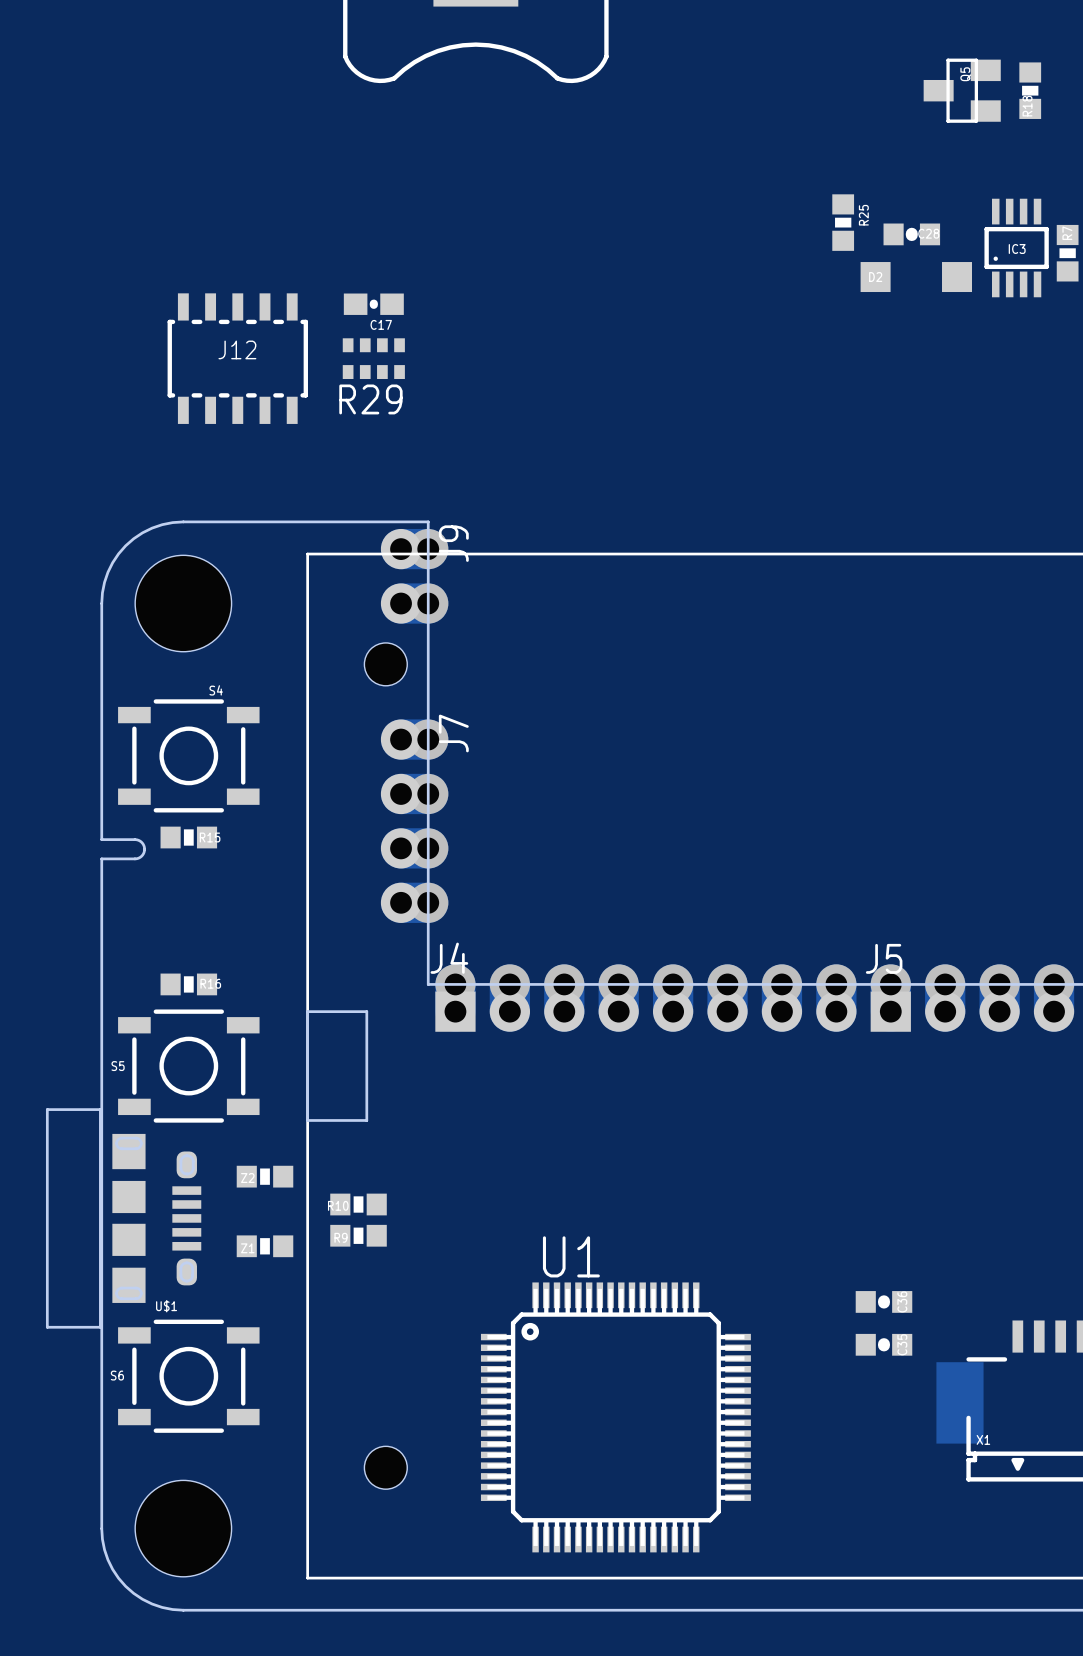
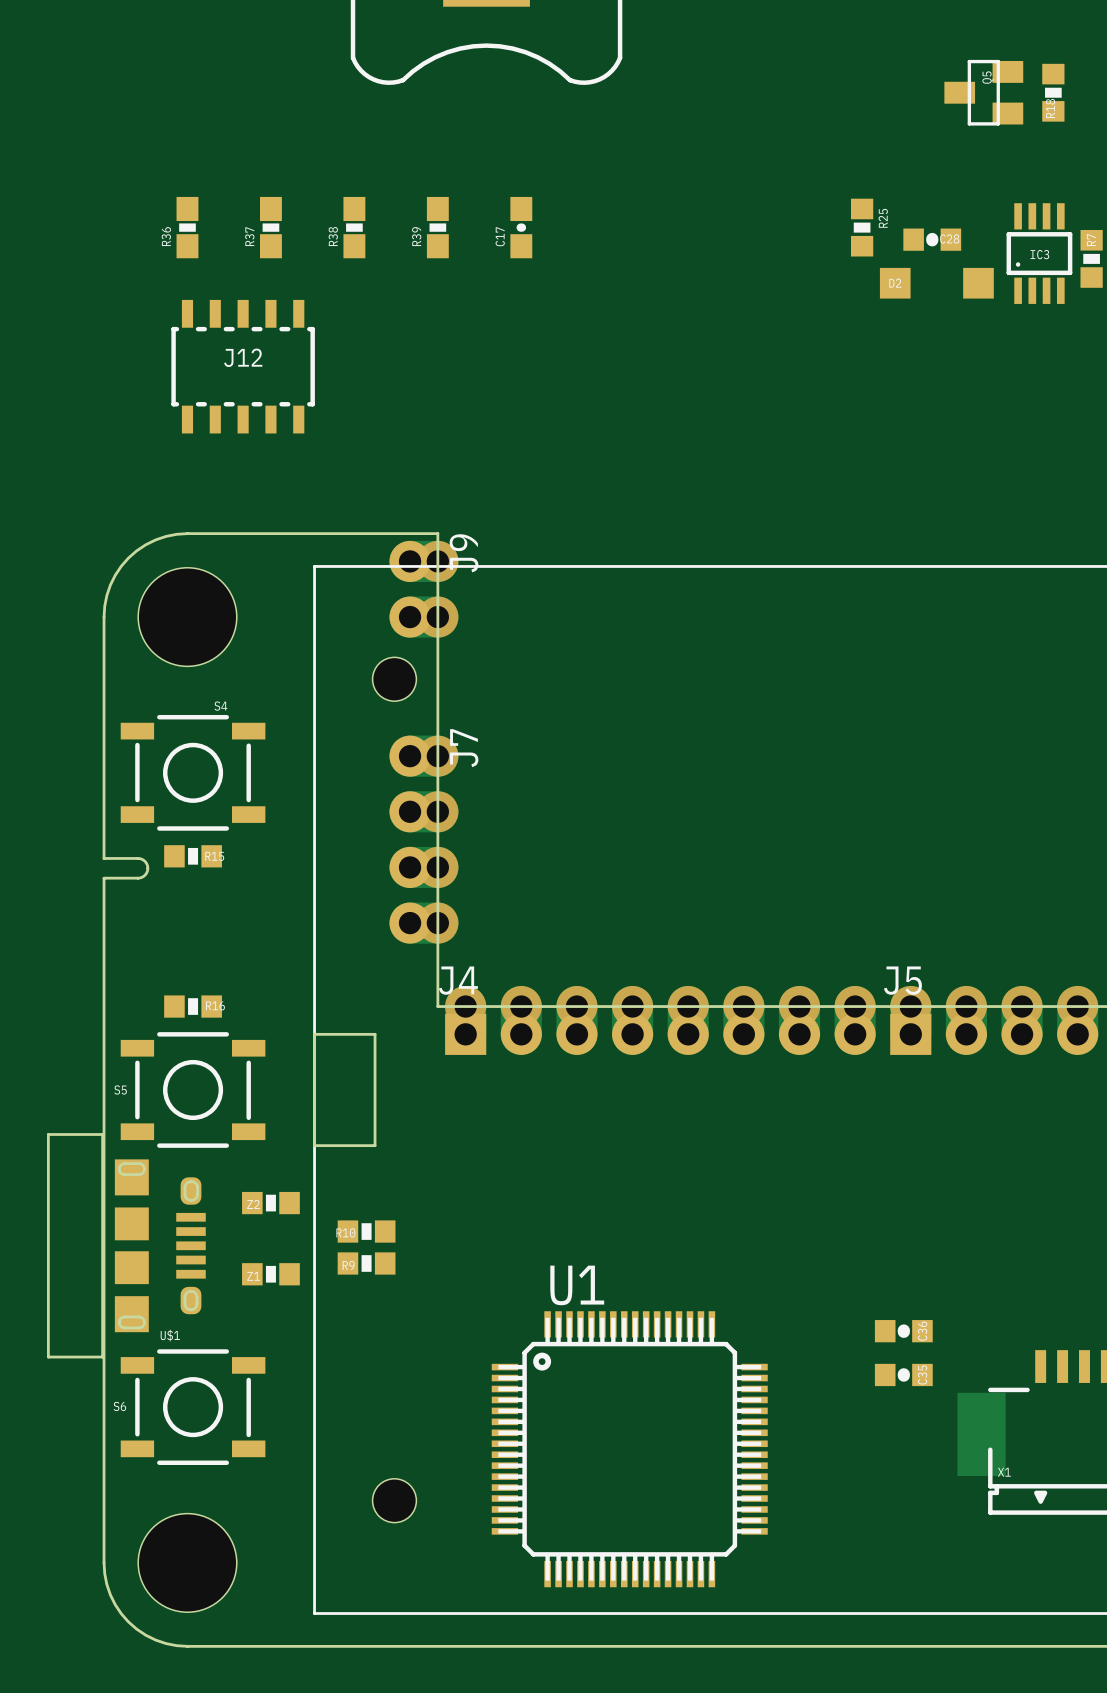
R36: none -> (187, 227)
R37: none -> (270, 227)
R38: none -> (354, 227)
R39: none -> (437, 227)
C17 rotation: 0° (373, 304) -> 90° clockwise (521, 227)
C17 position: (373, 304) -> (521, 227)
R29: (373, 358) -> none

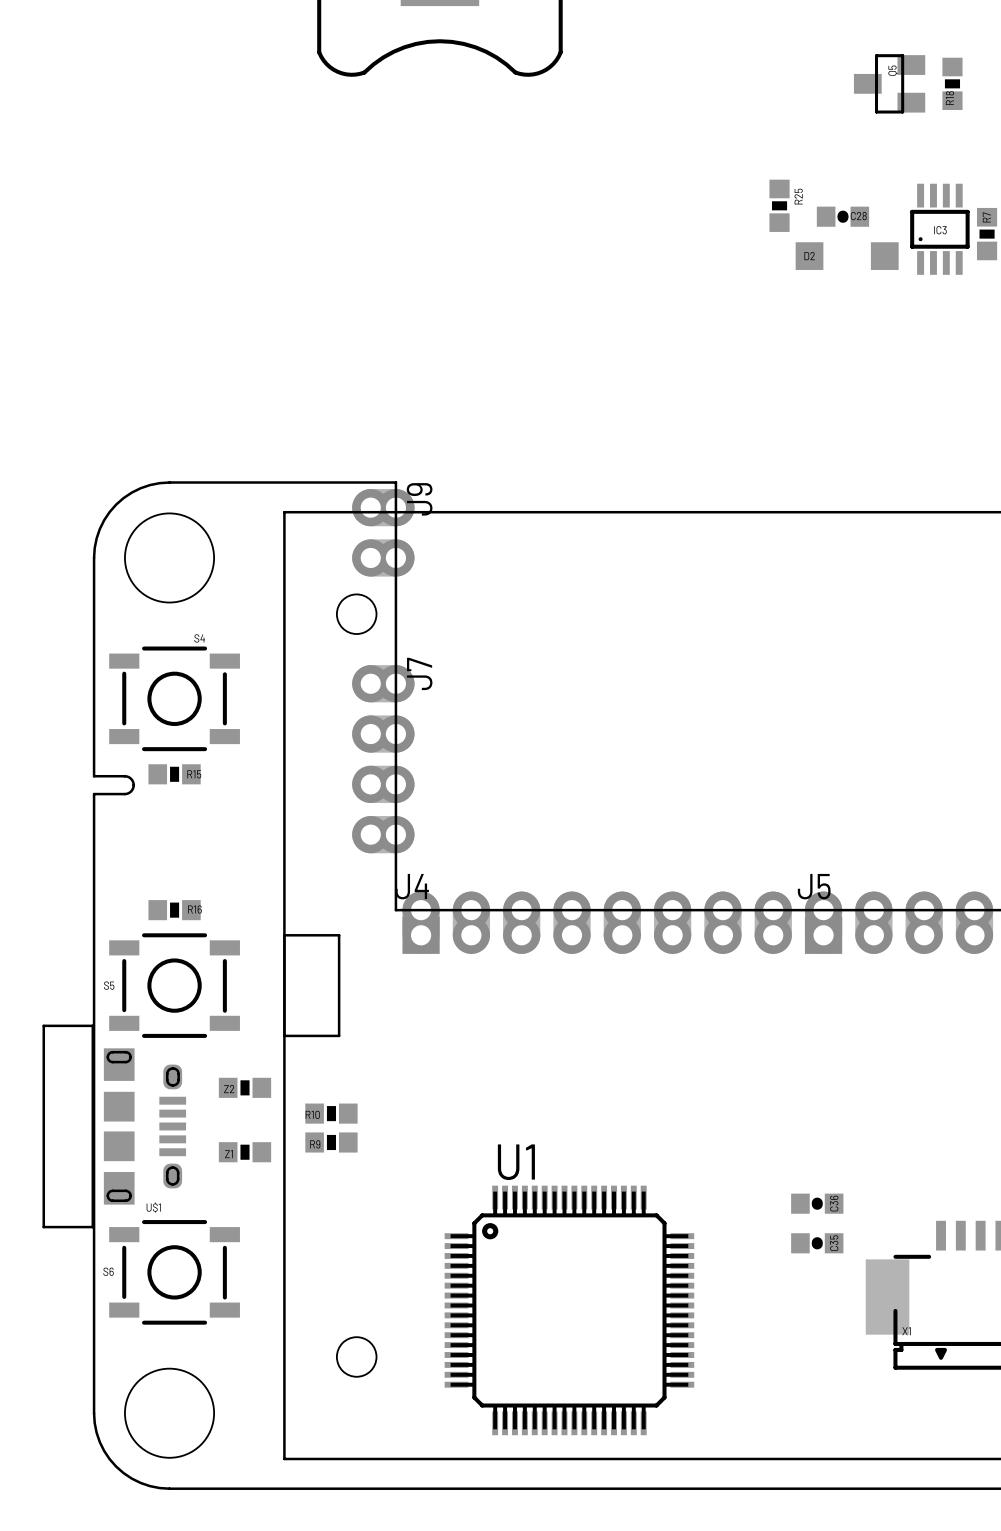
R36: (187, 227) -> none
R37: (270, 227) -> none
R38: (354, 227) -> none
R39: (437, 227) -> none
C17: (521, 227) -> none
J12: (243, 366) -> none

